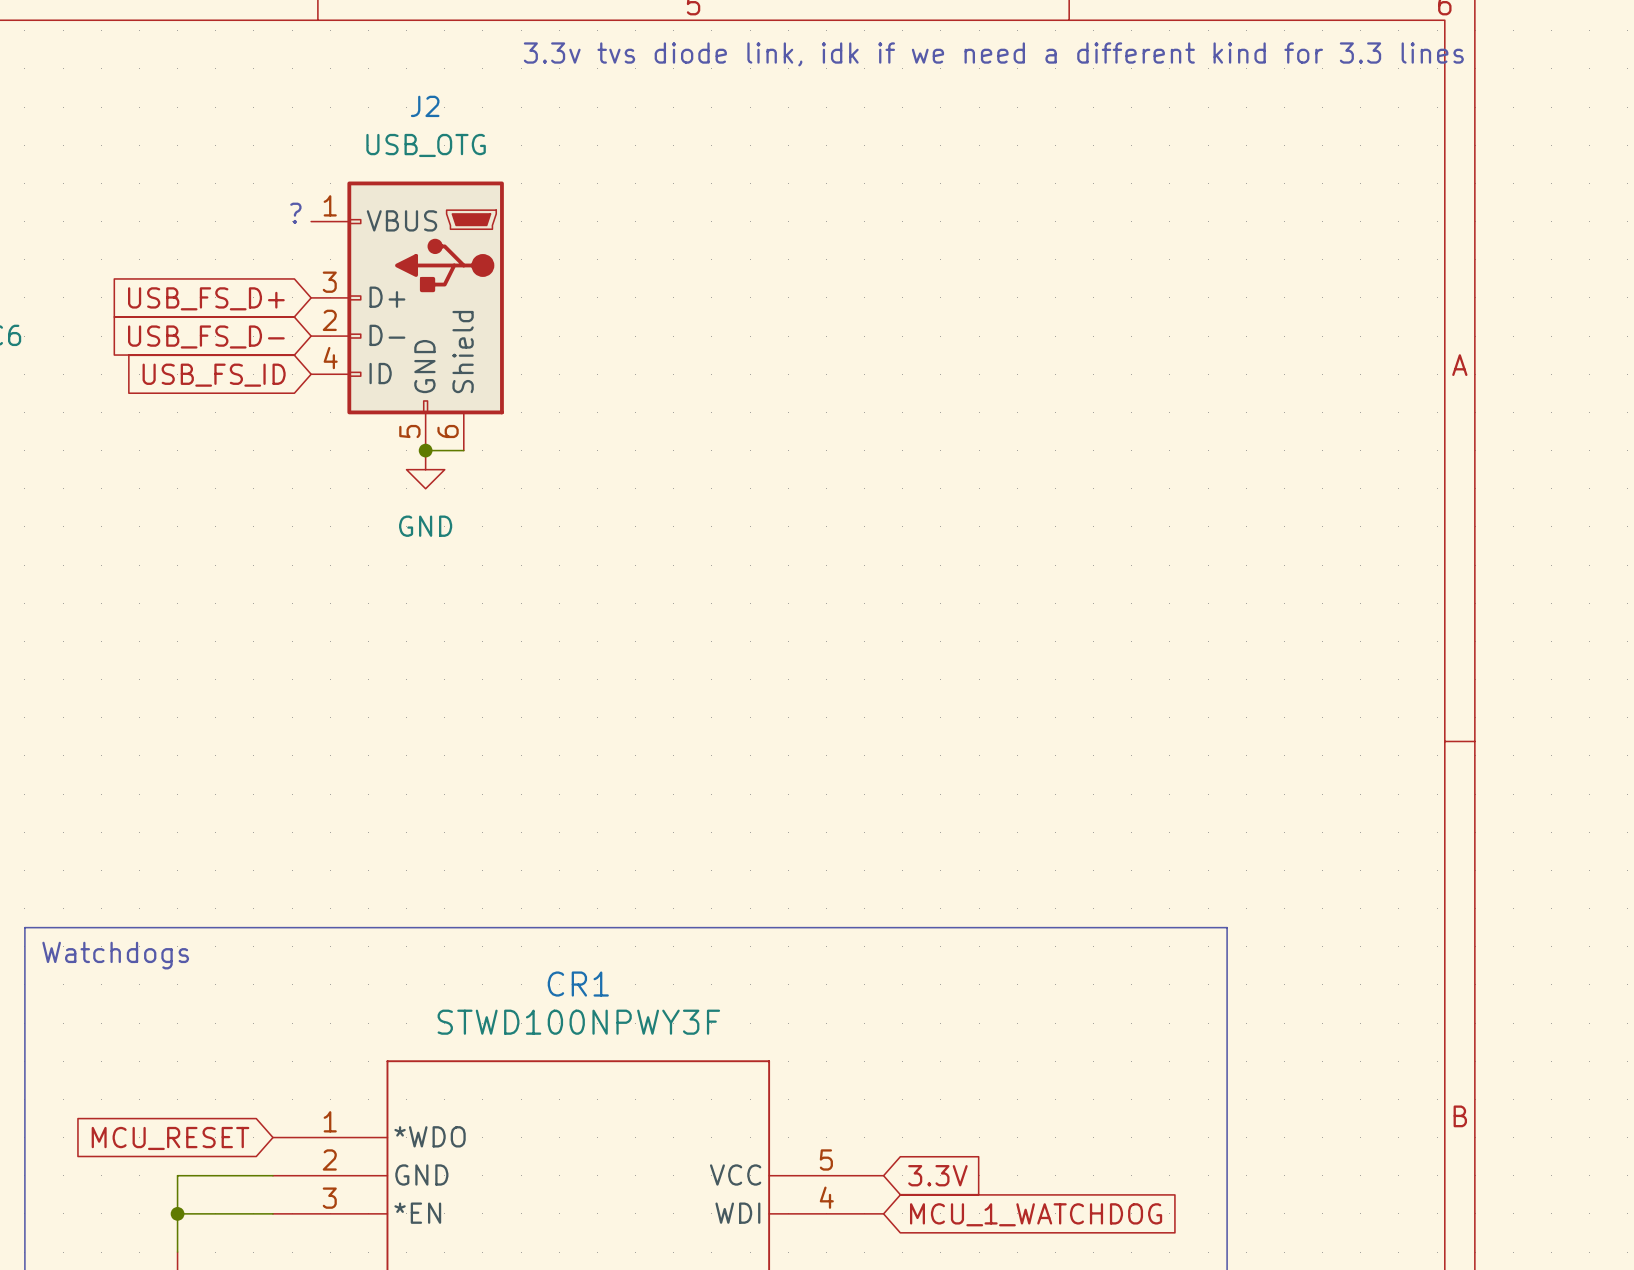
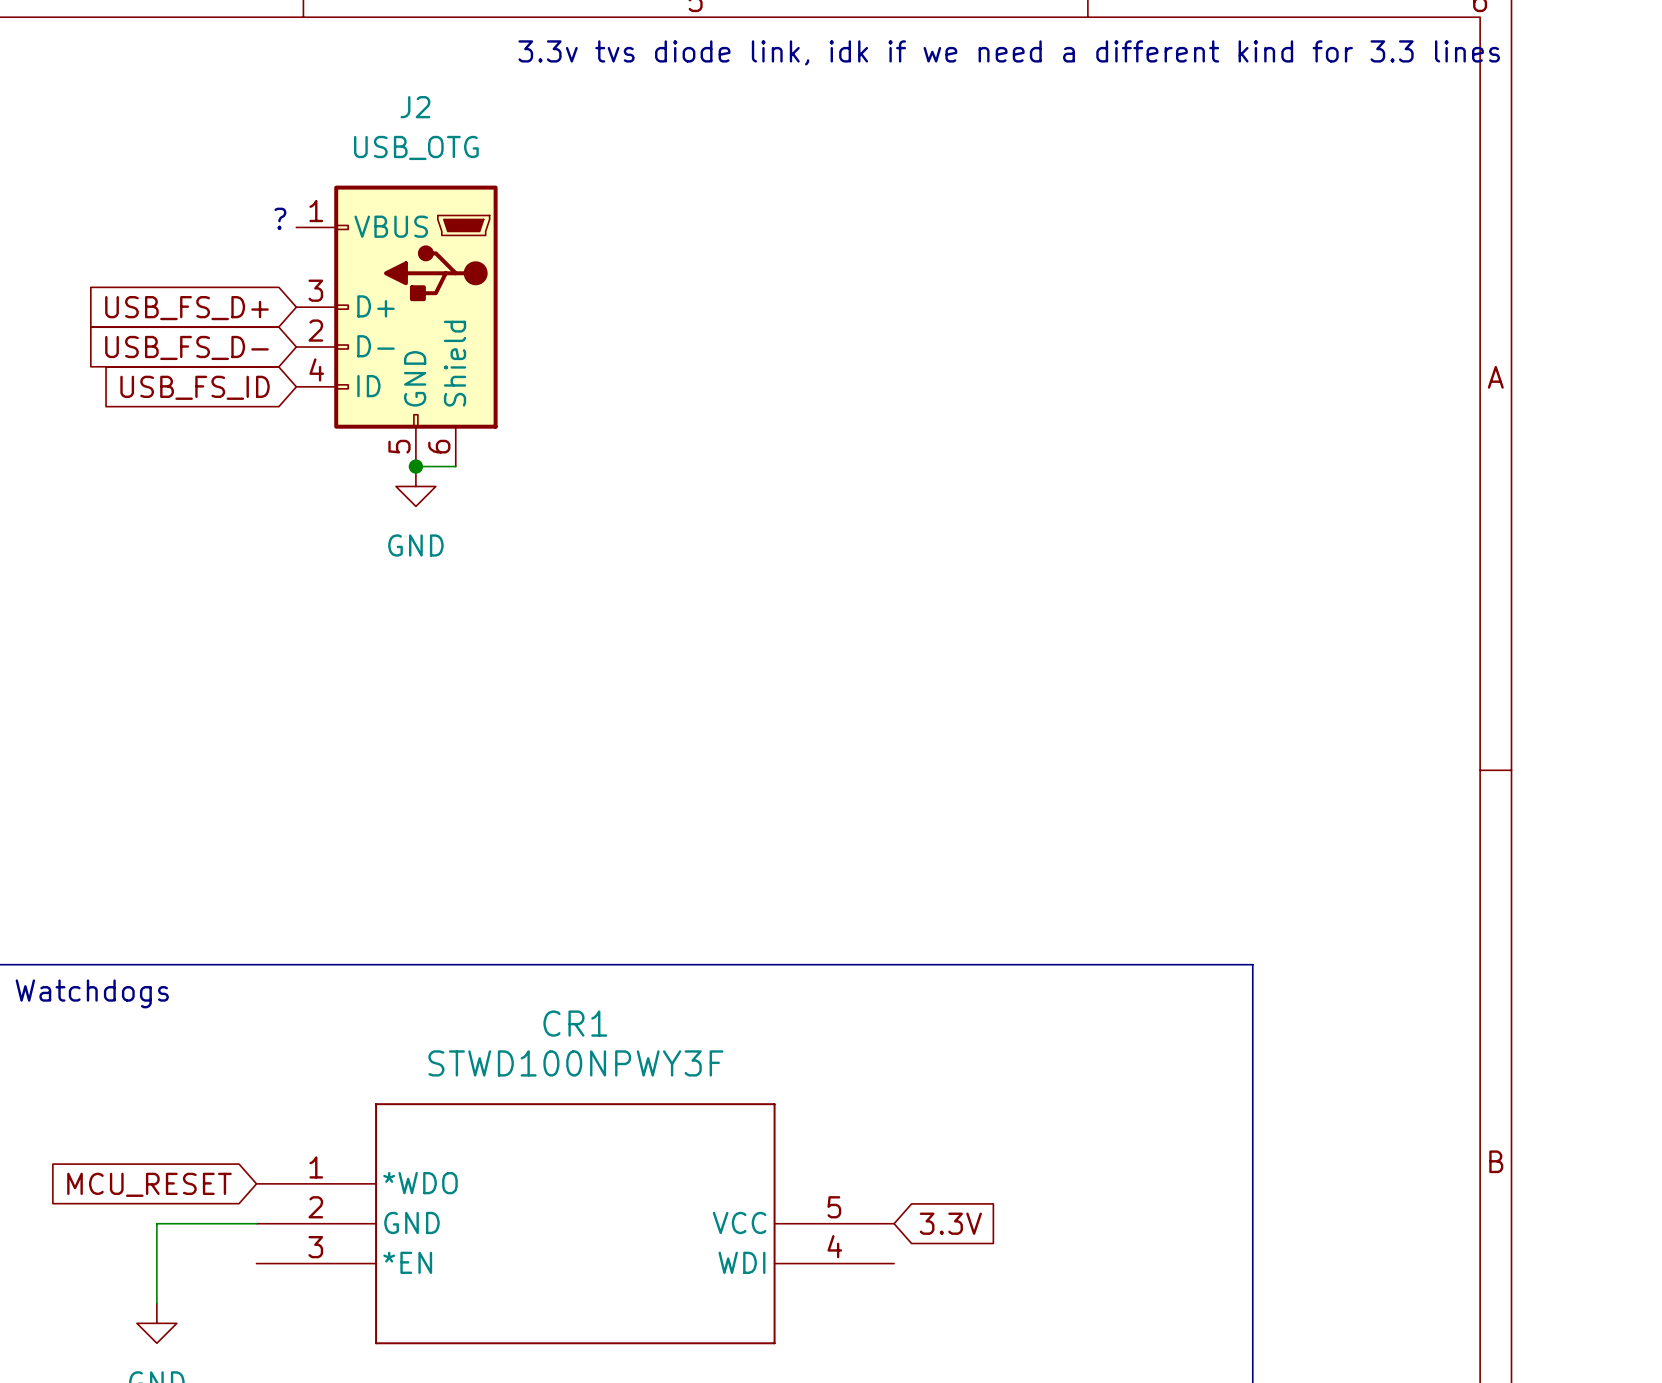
wire: (177, 1213) (272, 1213) -> none
junction: (177, 1213) -> none
global label: MCU_1_WATCHDOG (1036, 1214) -> none

